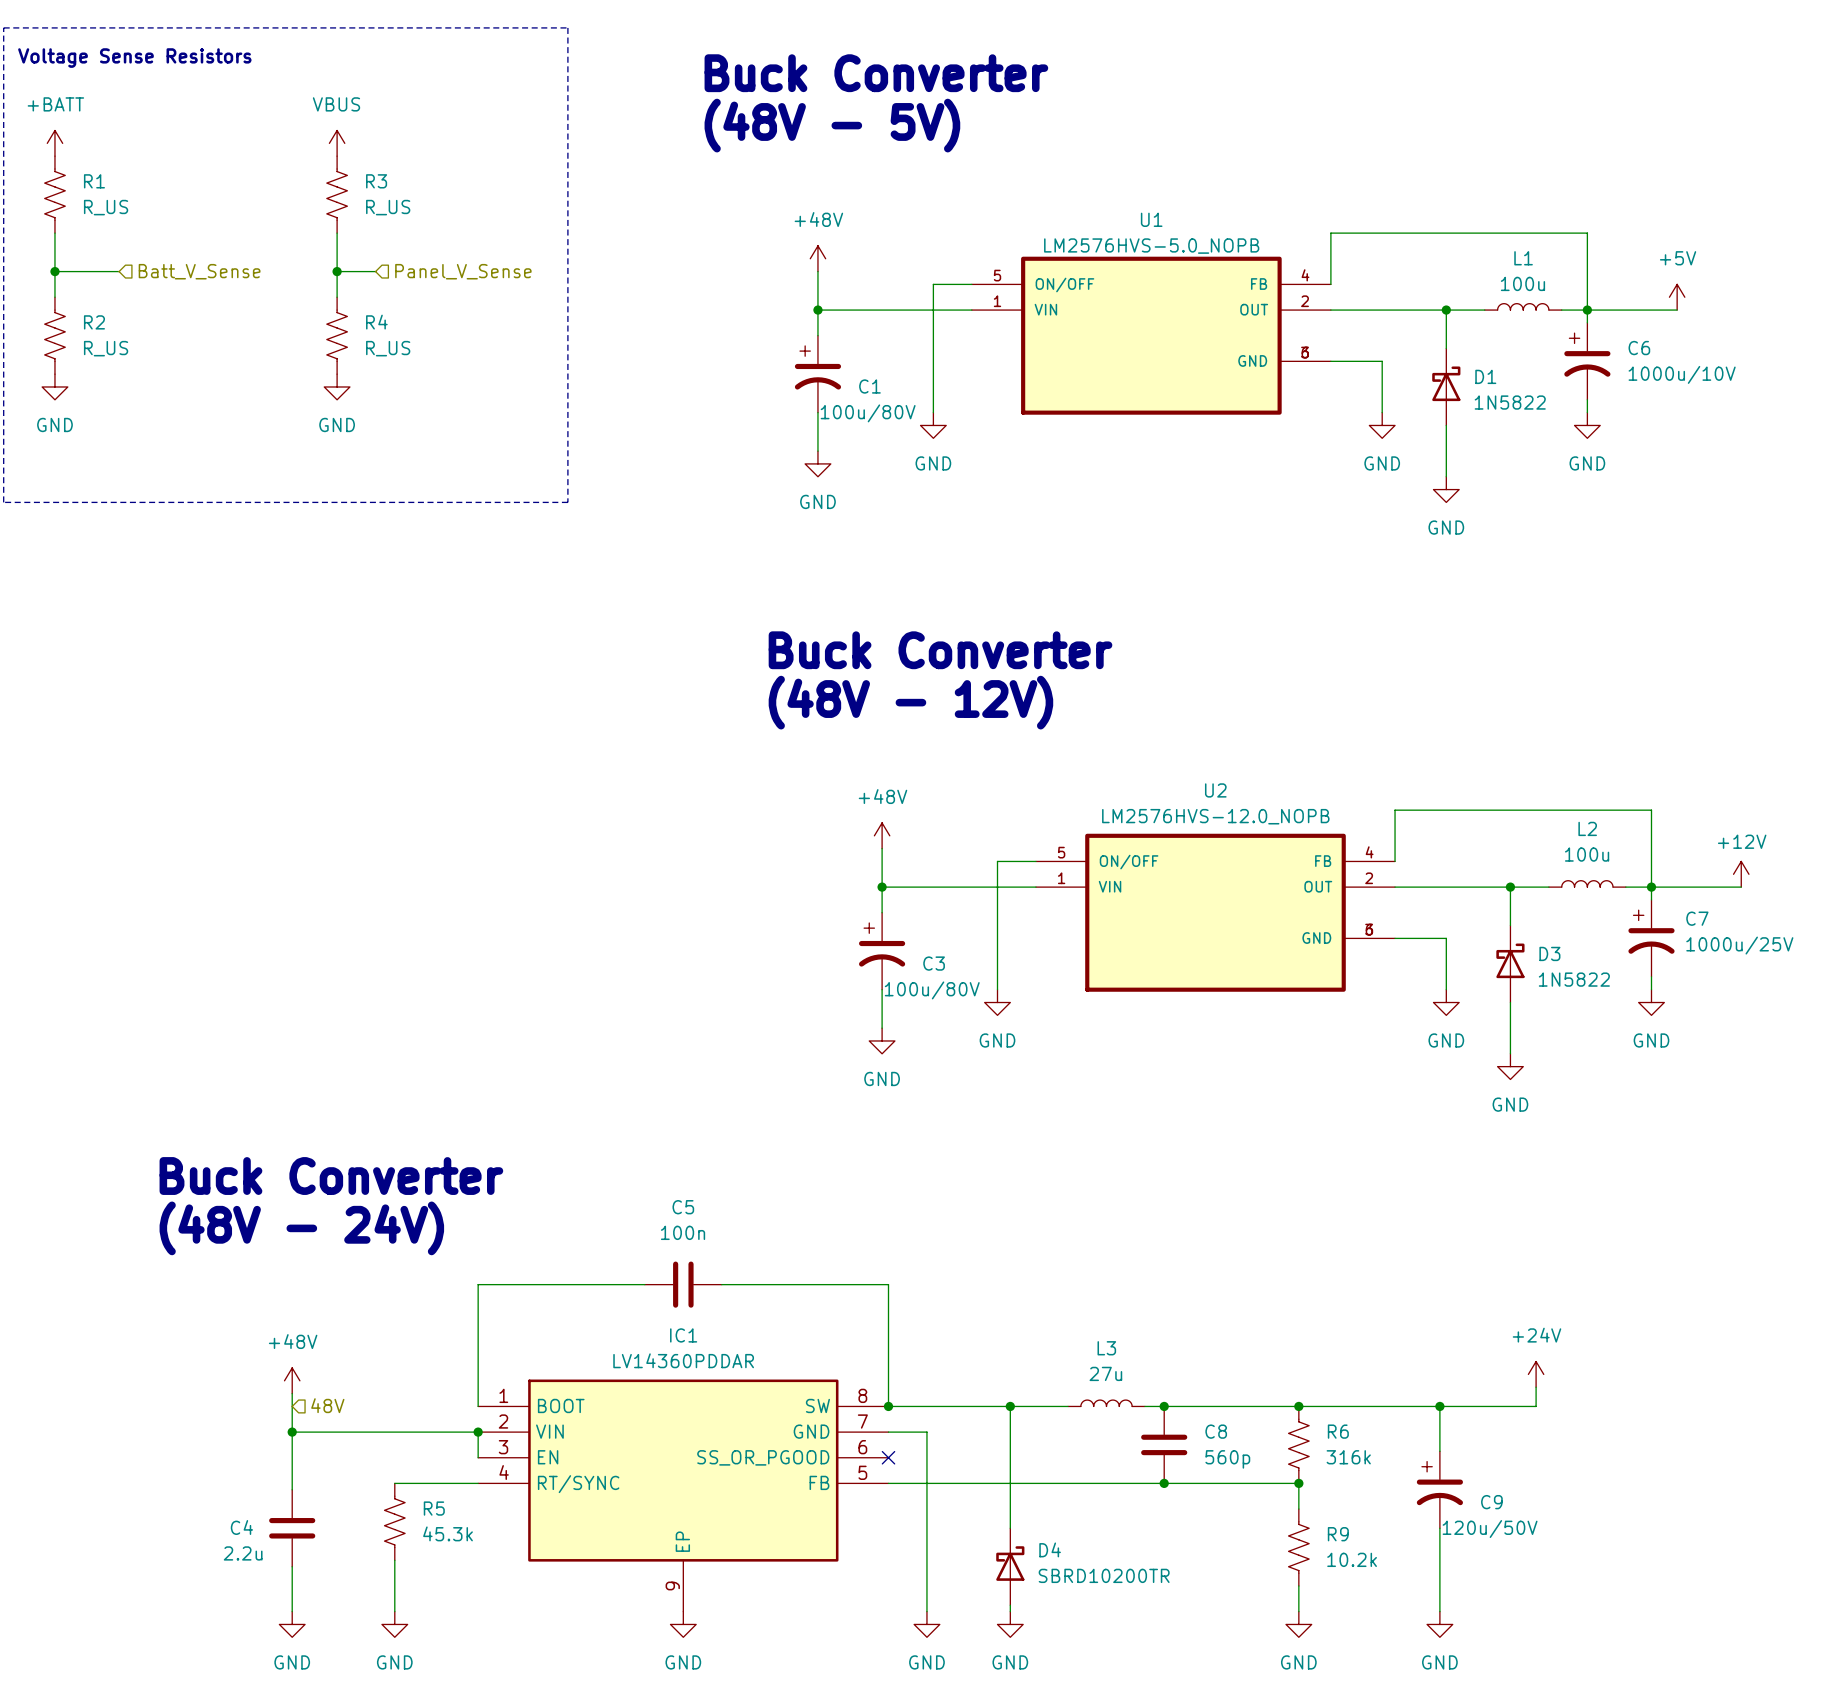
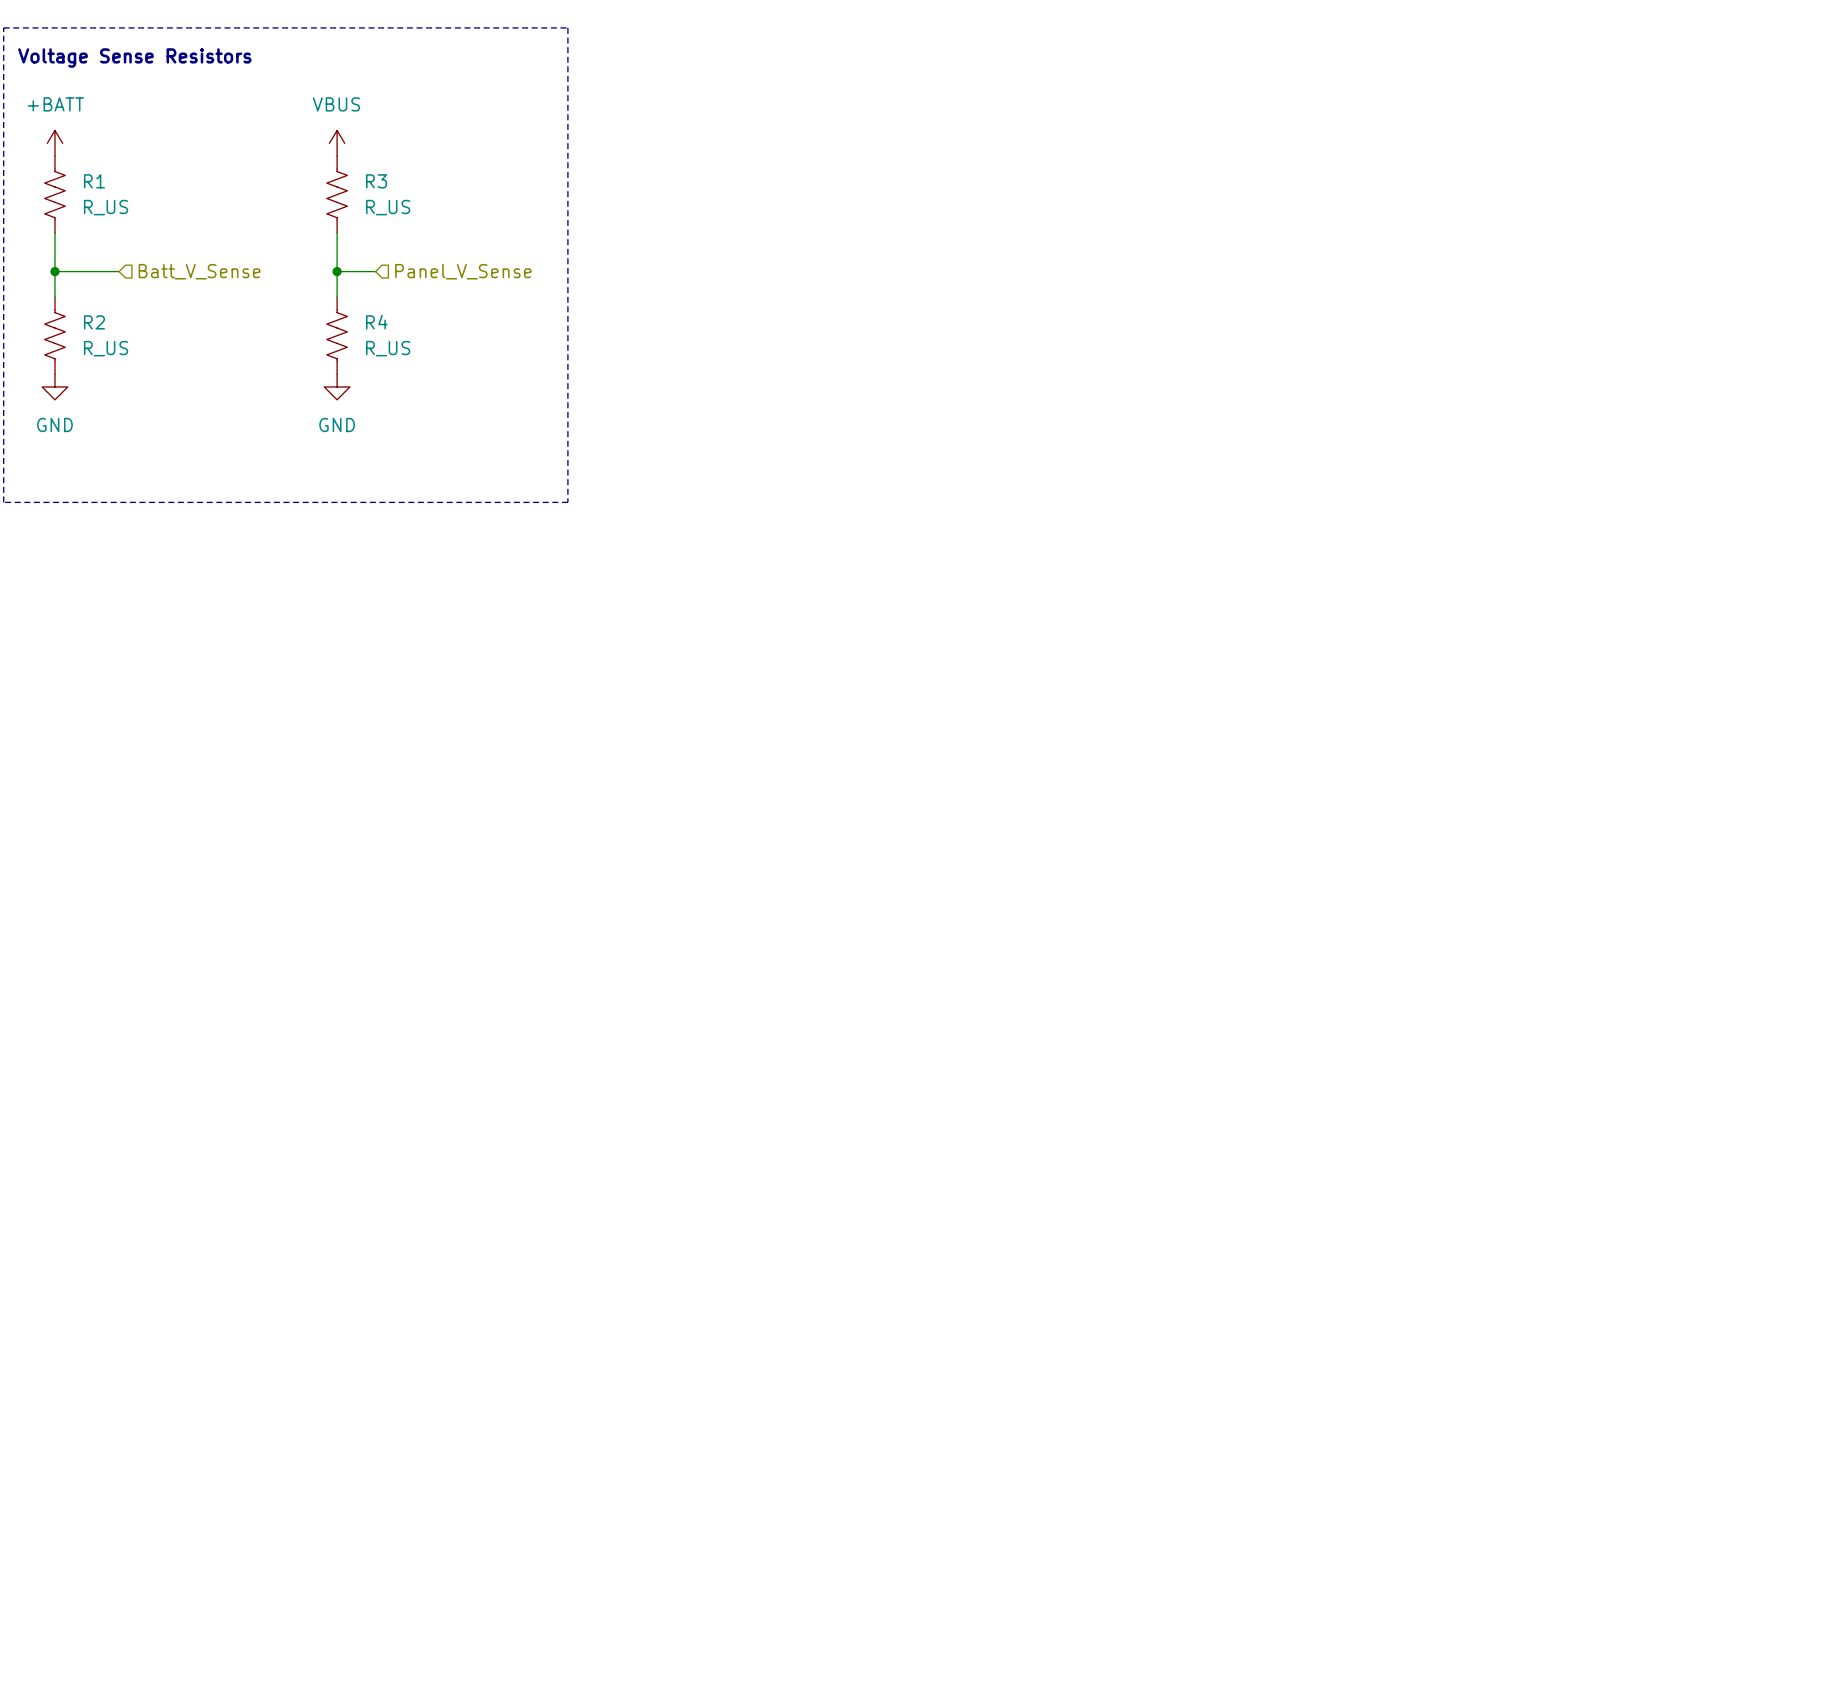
text: Buck Converter (876, 73) -> none
text: (48V - 5V) (832, 125) -> none
power symbol: +48V (817, 258) -> none
wire: (817, 271) (817, 335) -> none
wire: (971, 284) (933, 284) (933, 412) -> none
wire: (1330, 284) (1330, 233) (1587, 233) (1587, 322) -> none
power symbol: +5V (1677, 297) -> none
L1: 100u (1523, 306) -> none
wire: (817, 310) (971, 310) -> none
junction: (817, 310) -> none
wire: (1330, 310) (1484, 310) -> none
wire: (1446, 310) (1446, 348) -> none
junction: (1446, 310) -> none
wire: (1561, 310) (1677, 310) -> none
junction: (1587, 310) -> none
U1: LM2576HVS-5.0_NOPB (1151, 335) -> none
wire: (1330, 361) (1382, 361) (1382, 412) -> none
C6: 1000u/10V (1587, 361) -> none
C1: 100u/80V (817, 374) -> none
D1: 1N5822 (1446, 386) -> none
wire: (1587, 399) (1587, 412) -> none
wire: (817, 412) (817, 451) -> none
power symbol: GND (933, 425) -> none
power symbol: GND (1382, 425) -> none
wire: (1446, 425) (1446, 476) -> none
power symbol: GND (1587, 425) -> none
power symbol: GND (817, 463) -> none
power symbol: GND (1446, 489) -> none
text: Buck Converter (940, 650) -> none
text: (48V - 12V) (910, 702) -> none
power symbol: +48V (882, 835) -> none
wire: (882, 848) (882, 912) -> none
wire: (1035, 861) (997, 861) (997, 989) -> none
wire: (1395, 861) (1395, 810) (1651, 810) (1651, 899) -> none
power symbol: +12V (1741, 874) -> none
L2: 100u (1587, 883) -> none
wire: (882, 887) (1035, 887) -> none
junction: (882, 887) -> none
wire: (1395, 887) (1548, 887) -> none
wire: (1510, 887) (1510, 925) -> none
junction: (1510, 887) -> none
wire: (1625, 887) (1741, 887) -> none
junction: (1651, 887) -> none
U2: LM2576HVS-12.0_NOPB (1215, 912) -> none
wire: (1395, 938) (1446, 938) (1446, 989) -> none
C7: 1000u/25V (1651, 938) -> none
C3: 100u/80V (882, 951) -> none
D3: 1N5822 (1510, 964) -> none
wire: (1651, 976) (1651, 989) -> none
wire: (882, 989) (882, 1028) -> none
power symbol: GND (997, 1002) -> none
power symbol: GND (1446, 1002) -> none
wire: (1510, 1002) (1510, 1053) -> none
power symbol: GND (1651, 1002) -> none
power symbol: GND (882, 1040) -> none
power symbol: GND (1510, 1066) -> none
text: Buck Converter (331, 1176) -> none
text: (48V - 24V) (301, 1228) -> none
wire: (644, 1284) (478, 1284) (478, 1406) -> none
C5: 100n (683, 1284) -> none
wire: (721, 1284) (888, 1284) (888, 1406) (1068, 1406) -> none
power symbol: +24V (1536, 1374) -> none
power symbol: +48V (292, 1380) -> none
wire: (1536, 1387) (1536, 1406) (1144, 1406) -> none
wire: (292, 1393) (292, 1489) -> none
L3: 27u (1106, 1403) -> none
hierarchical label: 48V (327, 1405) -> none
junction: (888, 1406) -> none
wire: (1010, 1406) (1010, 1528) -> none
junction: (1010, 1406) -> none
junction: (1164, 1406) -> none
junction: (1298, 1406) -> none
wire: (1439, 1406) (1439, 1451) -> none
junction: (1439, 1406) -> none
wire: (292, 1432) (478, 1432) (478, 1457) -> none
junction: (292, 1432) -> none
junction: (478, 1432) -> none
wire: (888, 1432) (926, 1432) (926, 1611) -> none
C8: 560p (1164, 1444) -> none
R6: 316k (1298, 1444) -> none
no-connect mark: (888, 1457) -> none
wire: (394, 1483) (478, 1483) -> none
wire: (888, 1483) (1298, 1483) (1298, 1509) -> none
junction: (1164, 1483) -> none
junction: (1298, 1483) -> none
C9: 120u/50V (1439, 1489) -> none
IC1: LV14360PDDAR (683, 1495) -> none
R5: 45.3k (394, 1521) -> none
C4: 2.2u (292, 1528) -> none
wire: (1439, 1528) (1439, 1611) -> none
R9: 10.2k (1298, 1547) -> none
wire: (394, 1560) (394, 1611) -> none
wire: (292, 1566) (292, 1611) -> none
D4: SBRD10200TR (1010, 1566) -> none
wire: (1298, 1585) (1298, 1611) -> none
wire: (1010, 1605) (1010, 1611) -> none
power symbol: GND (292, 1624) -> none
power symbol: GND (394, 1624) -> none
power symbol: GND (683, 1624) -> none
power symbol: GND (926, 1624) -> none
power symbol: GND (1010, 1624) -> none
power symbol: GND (1298, 1624) -> none
power symbol: GND (1439, 1624) -> none

